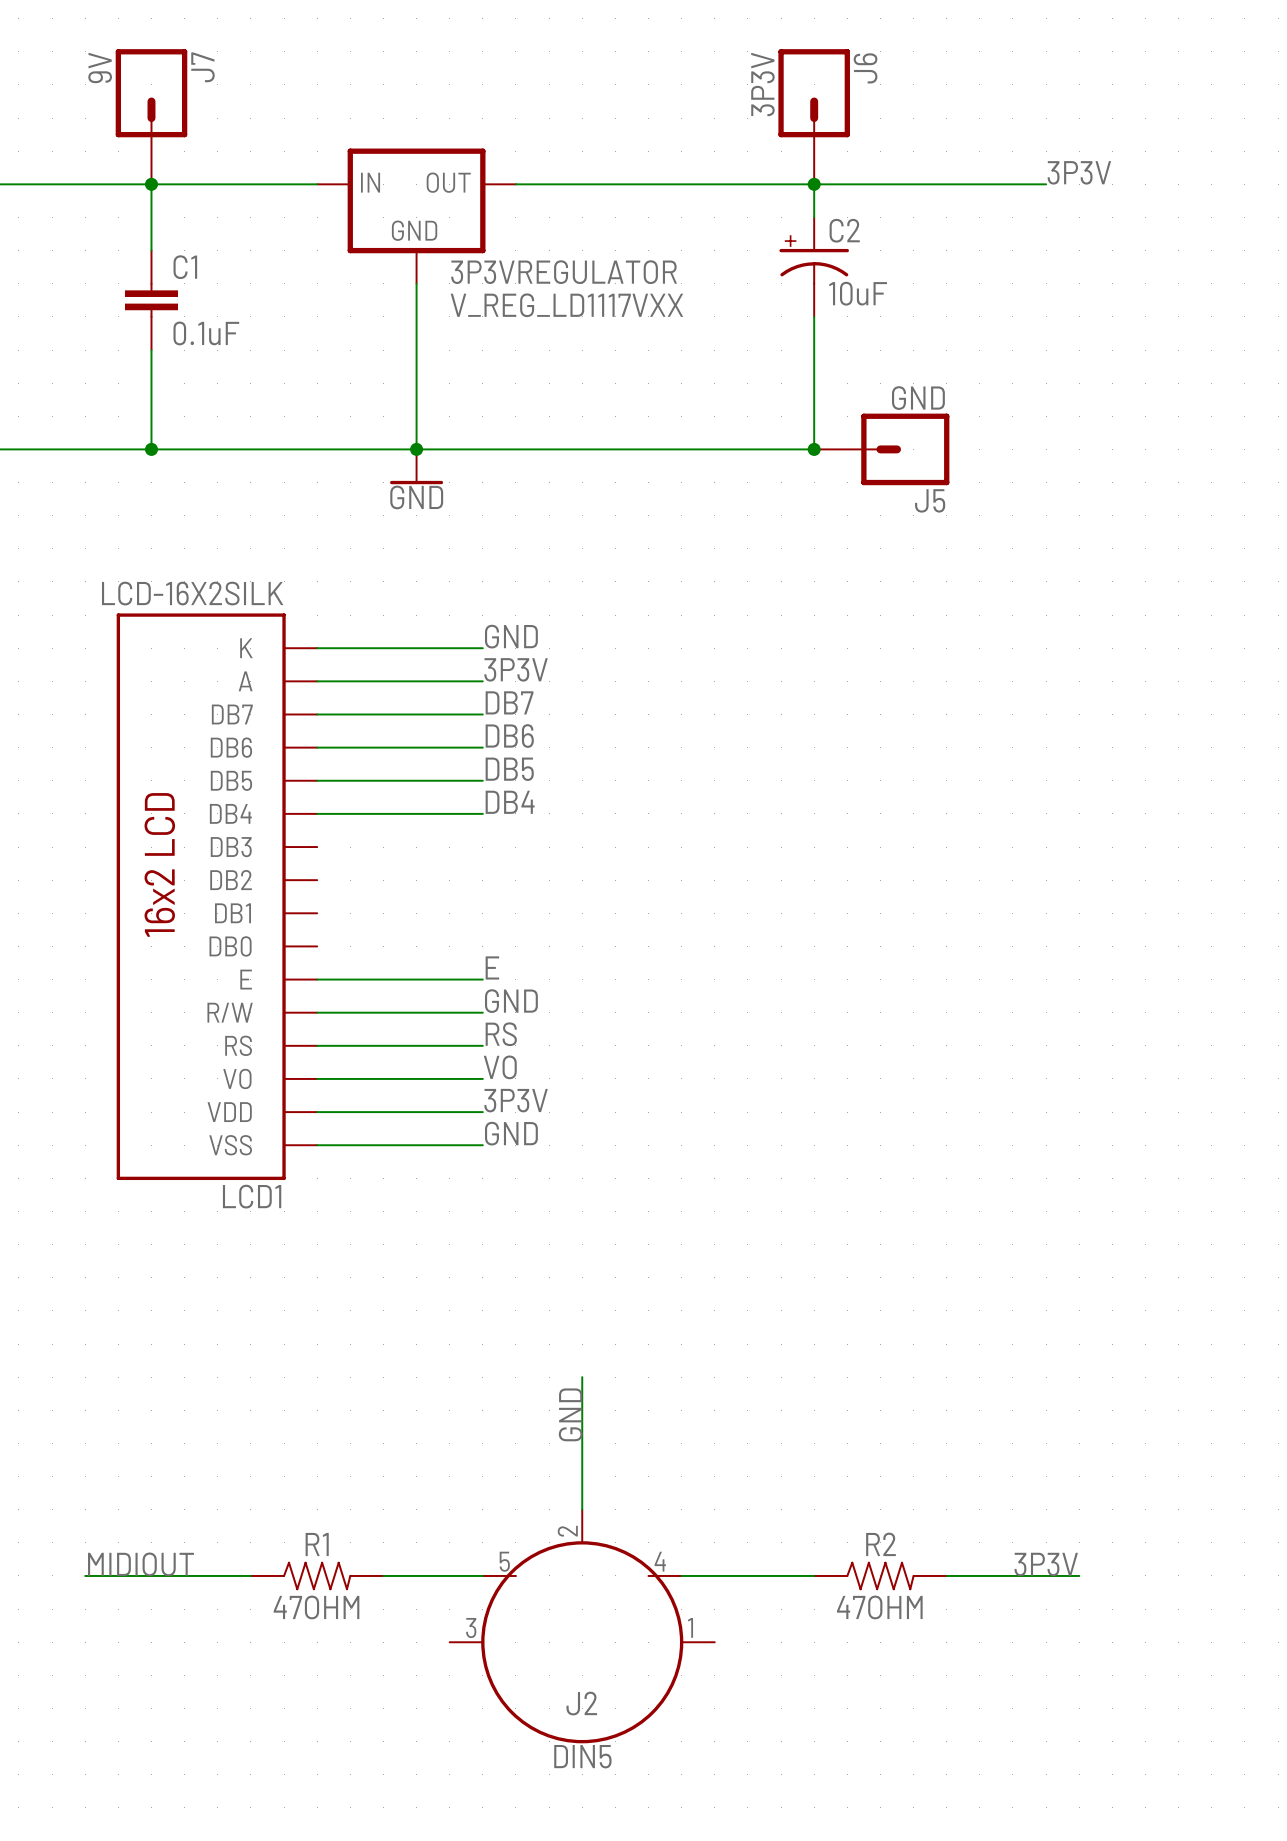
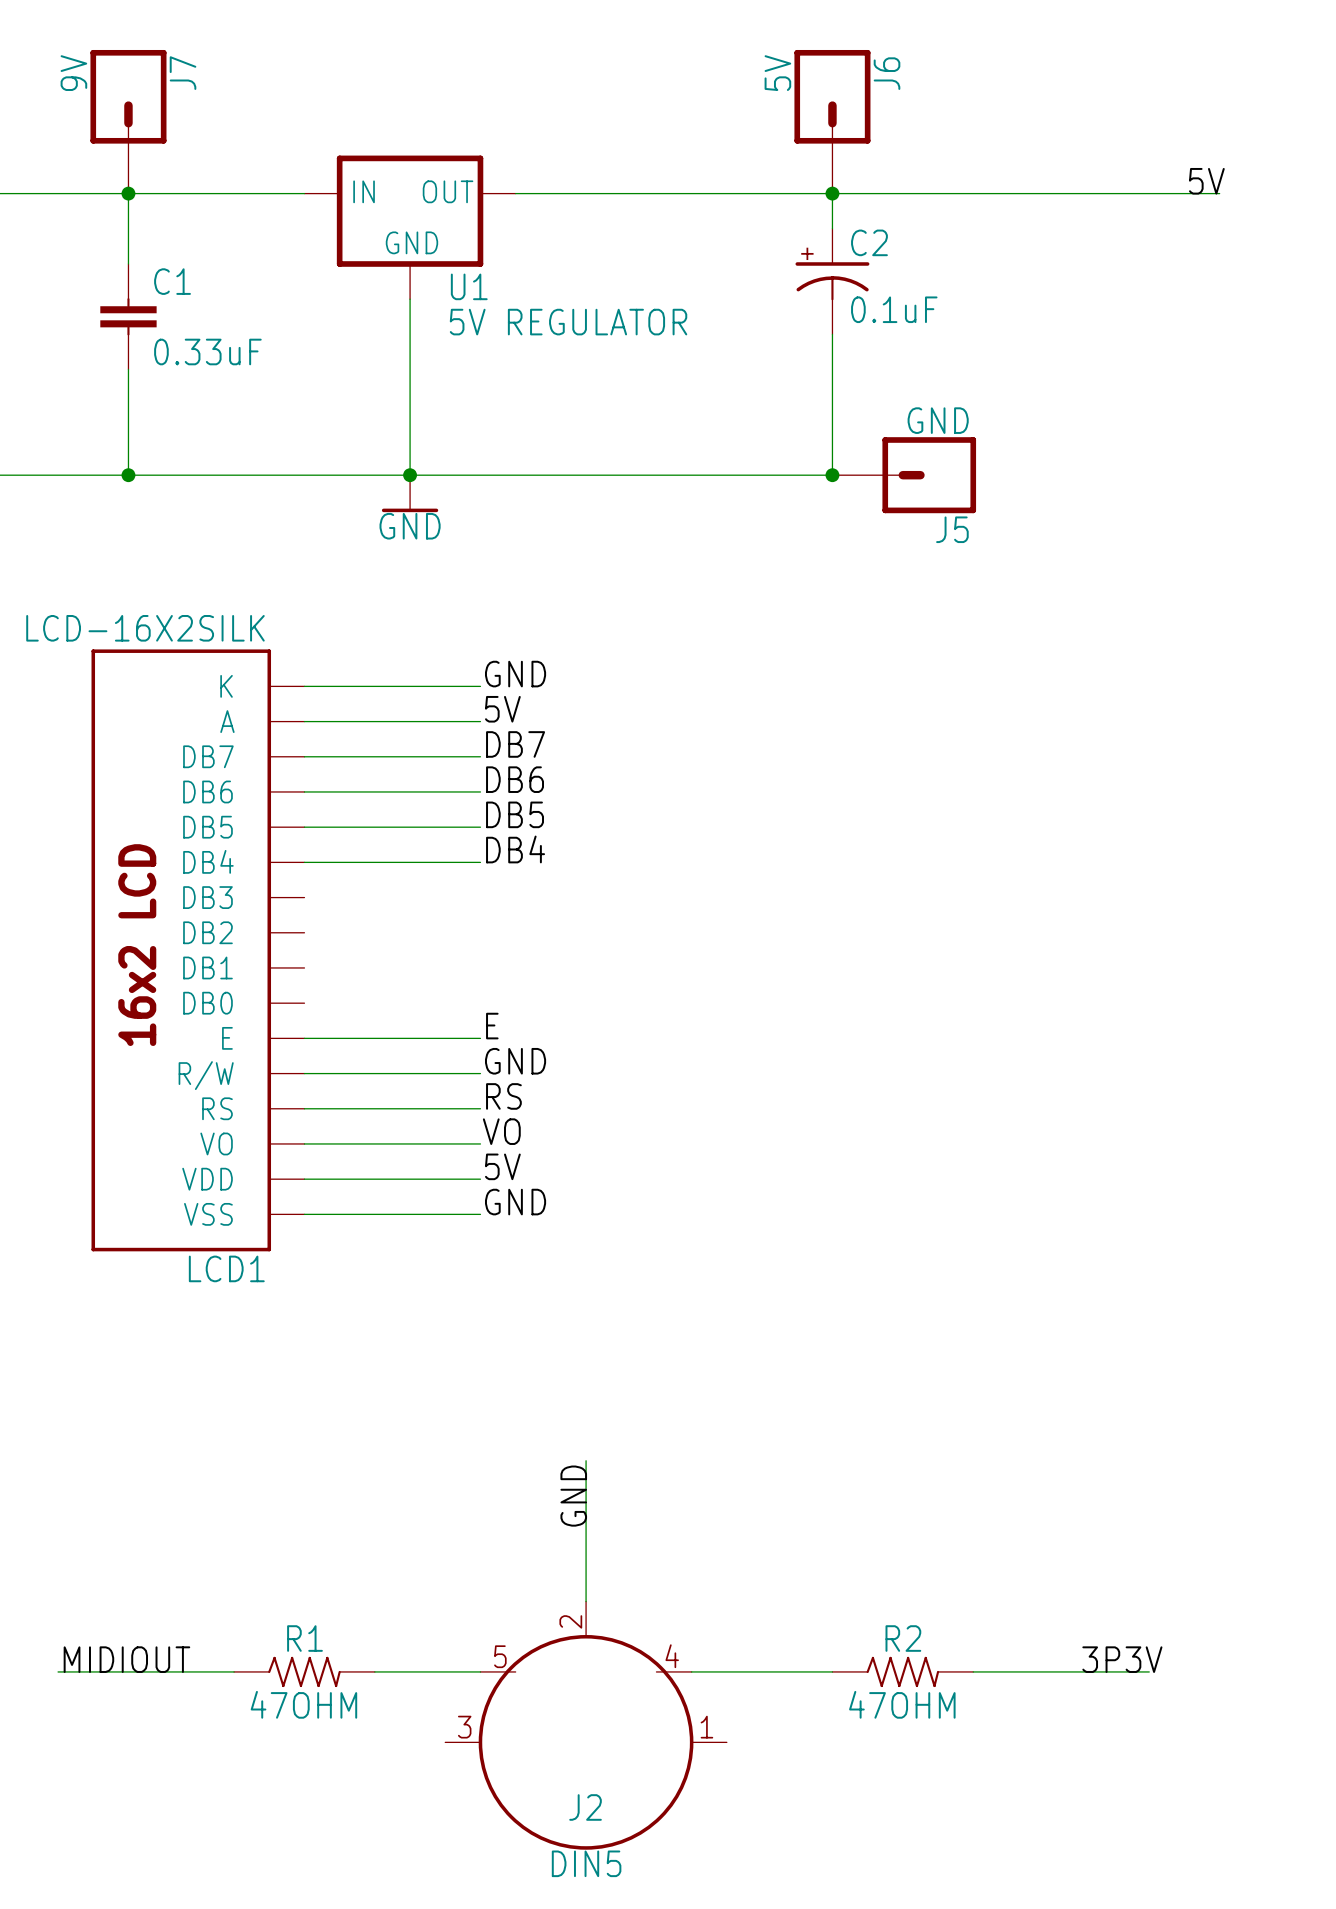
J6 value: 3P3V (762, 84) -> 5V (777, 73)
label: 3P3V (1079, 172) -> none
label: none -> 5V (1206, 181)
wire: none -> (1078, 193) (1219, 193)
3P3VREGULATOR name: 3P3VREGULATOR (564, 272) -> U1 (469, 286)
C2 value: 10uF (858, 293) -> 0.1uF (894, 309)
3P3VREGULATOR value: V_REG_LD1117VXX (566, 305) -> 5V REGULATOR (568, 322)
C1 value: 0.1uF (206, 333) -> 0.33uF (207, 351)
label: 3P3V (516, 669) -> 5V (502, 709)
label: 3P3V (516, 1100) -> 5V (502, 1166)
label position: 3P3V (1046, 1564) -> 3P3V (1122, 1659)
wire: none -> (1114, 1671) (1149, 1671)

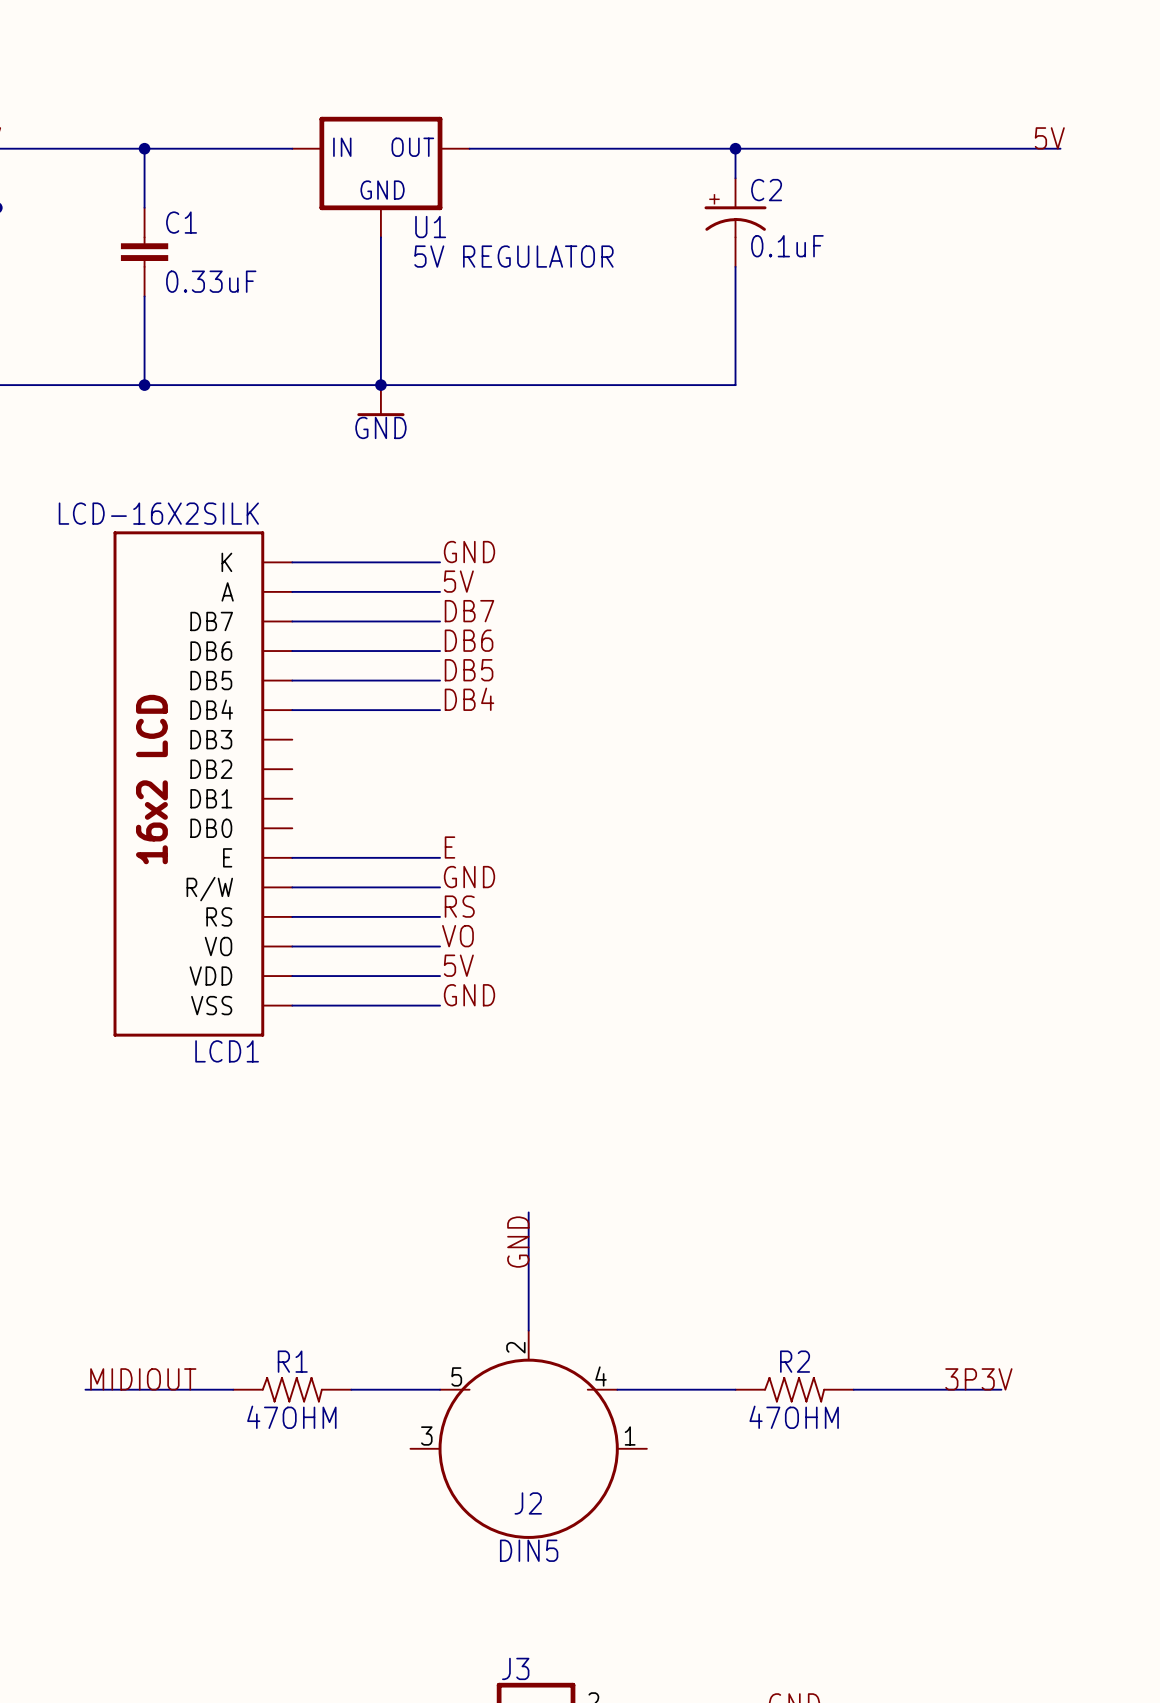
J7: 9V (128, 121) -> none
J6: 5V (832, 121) -> none
junction: (832, 475) -> none
J5: GND (904, 475) -> none

